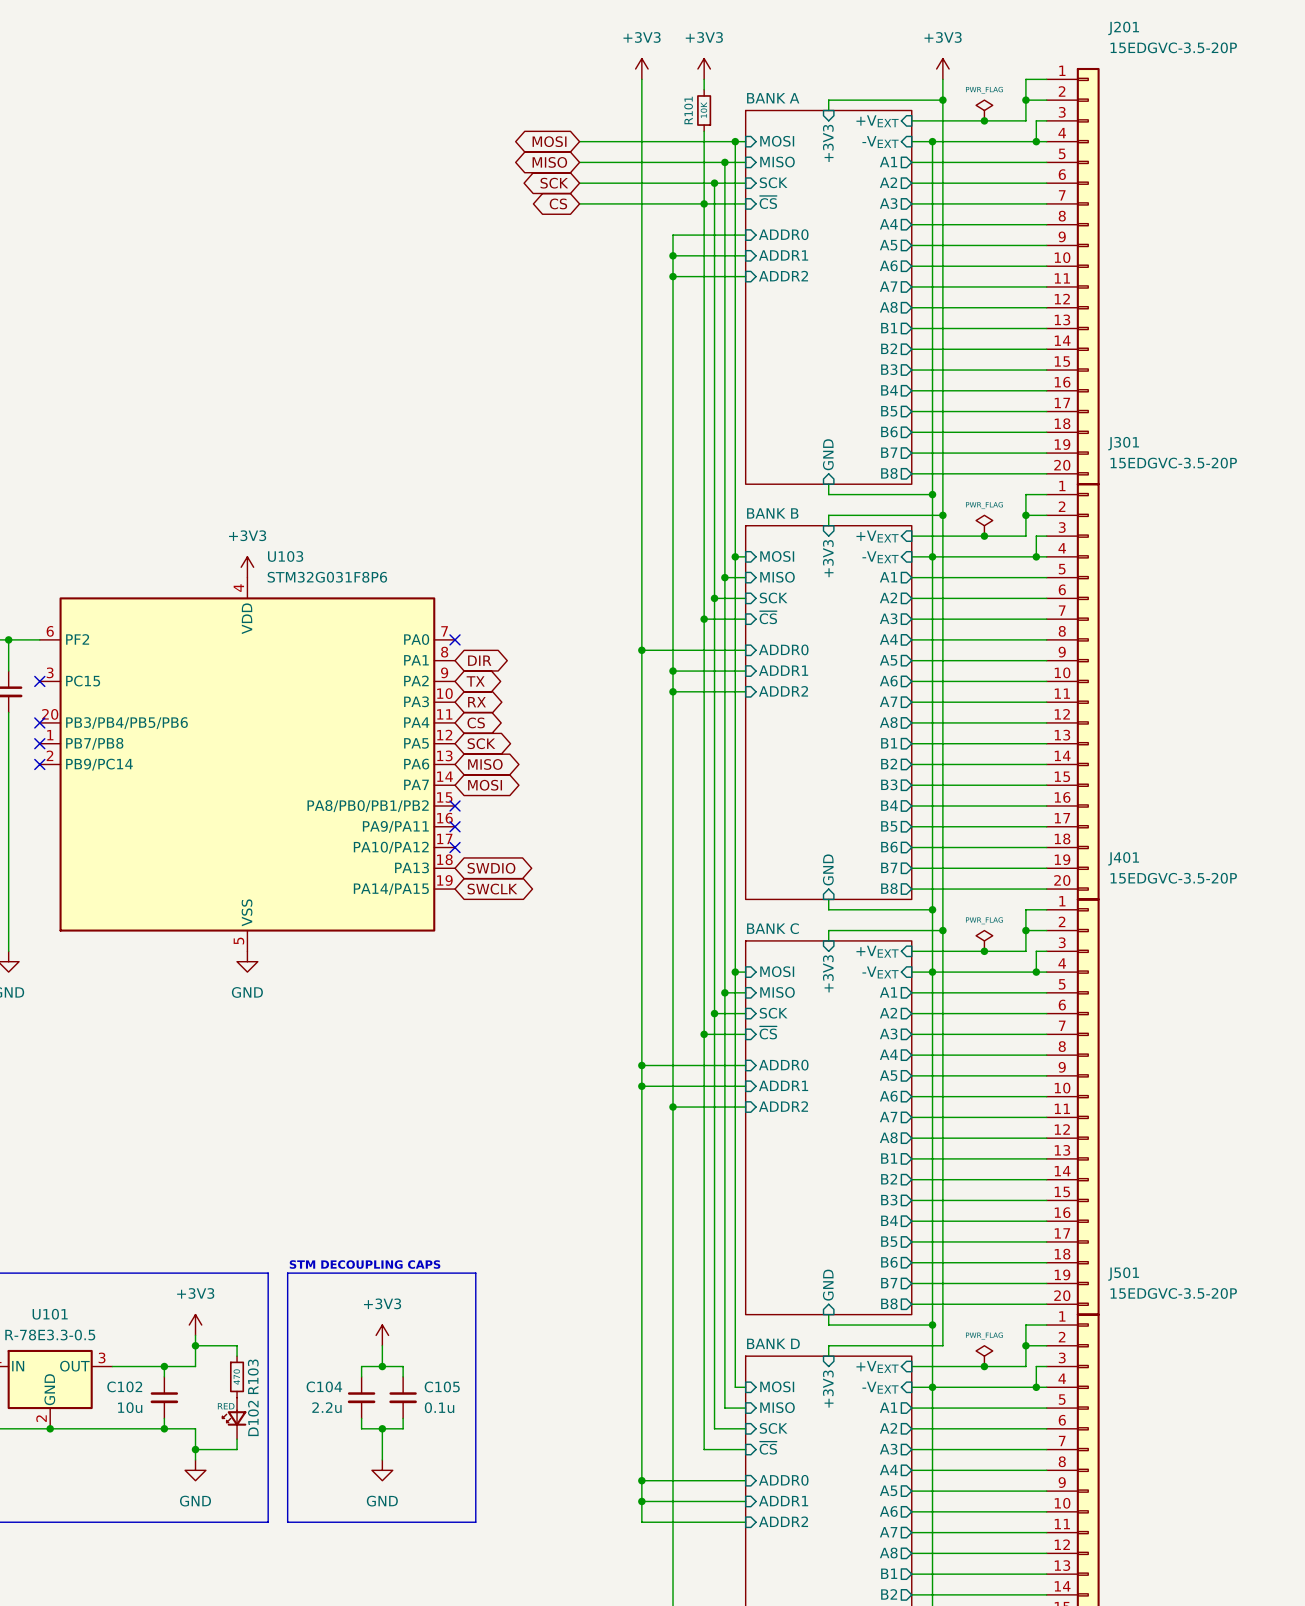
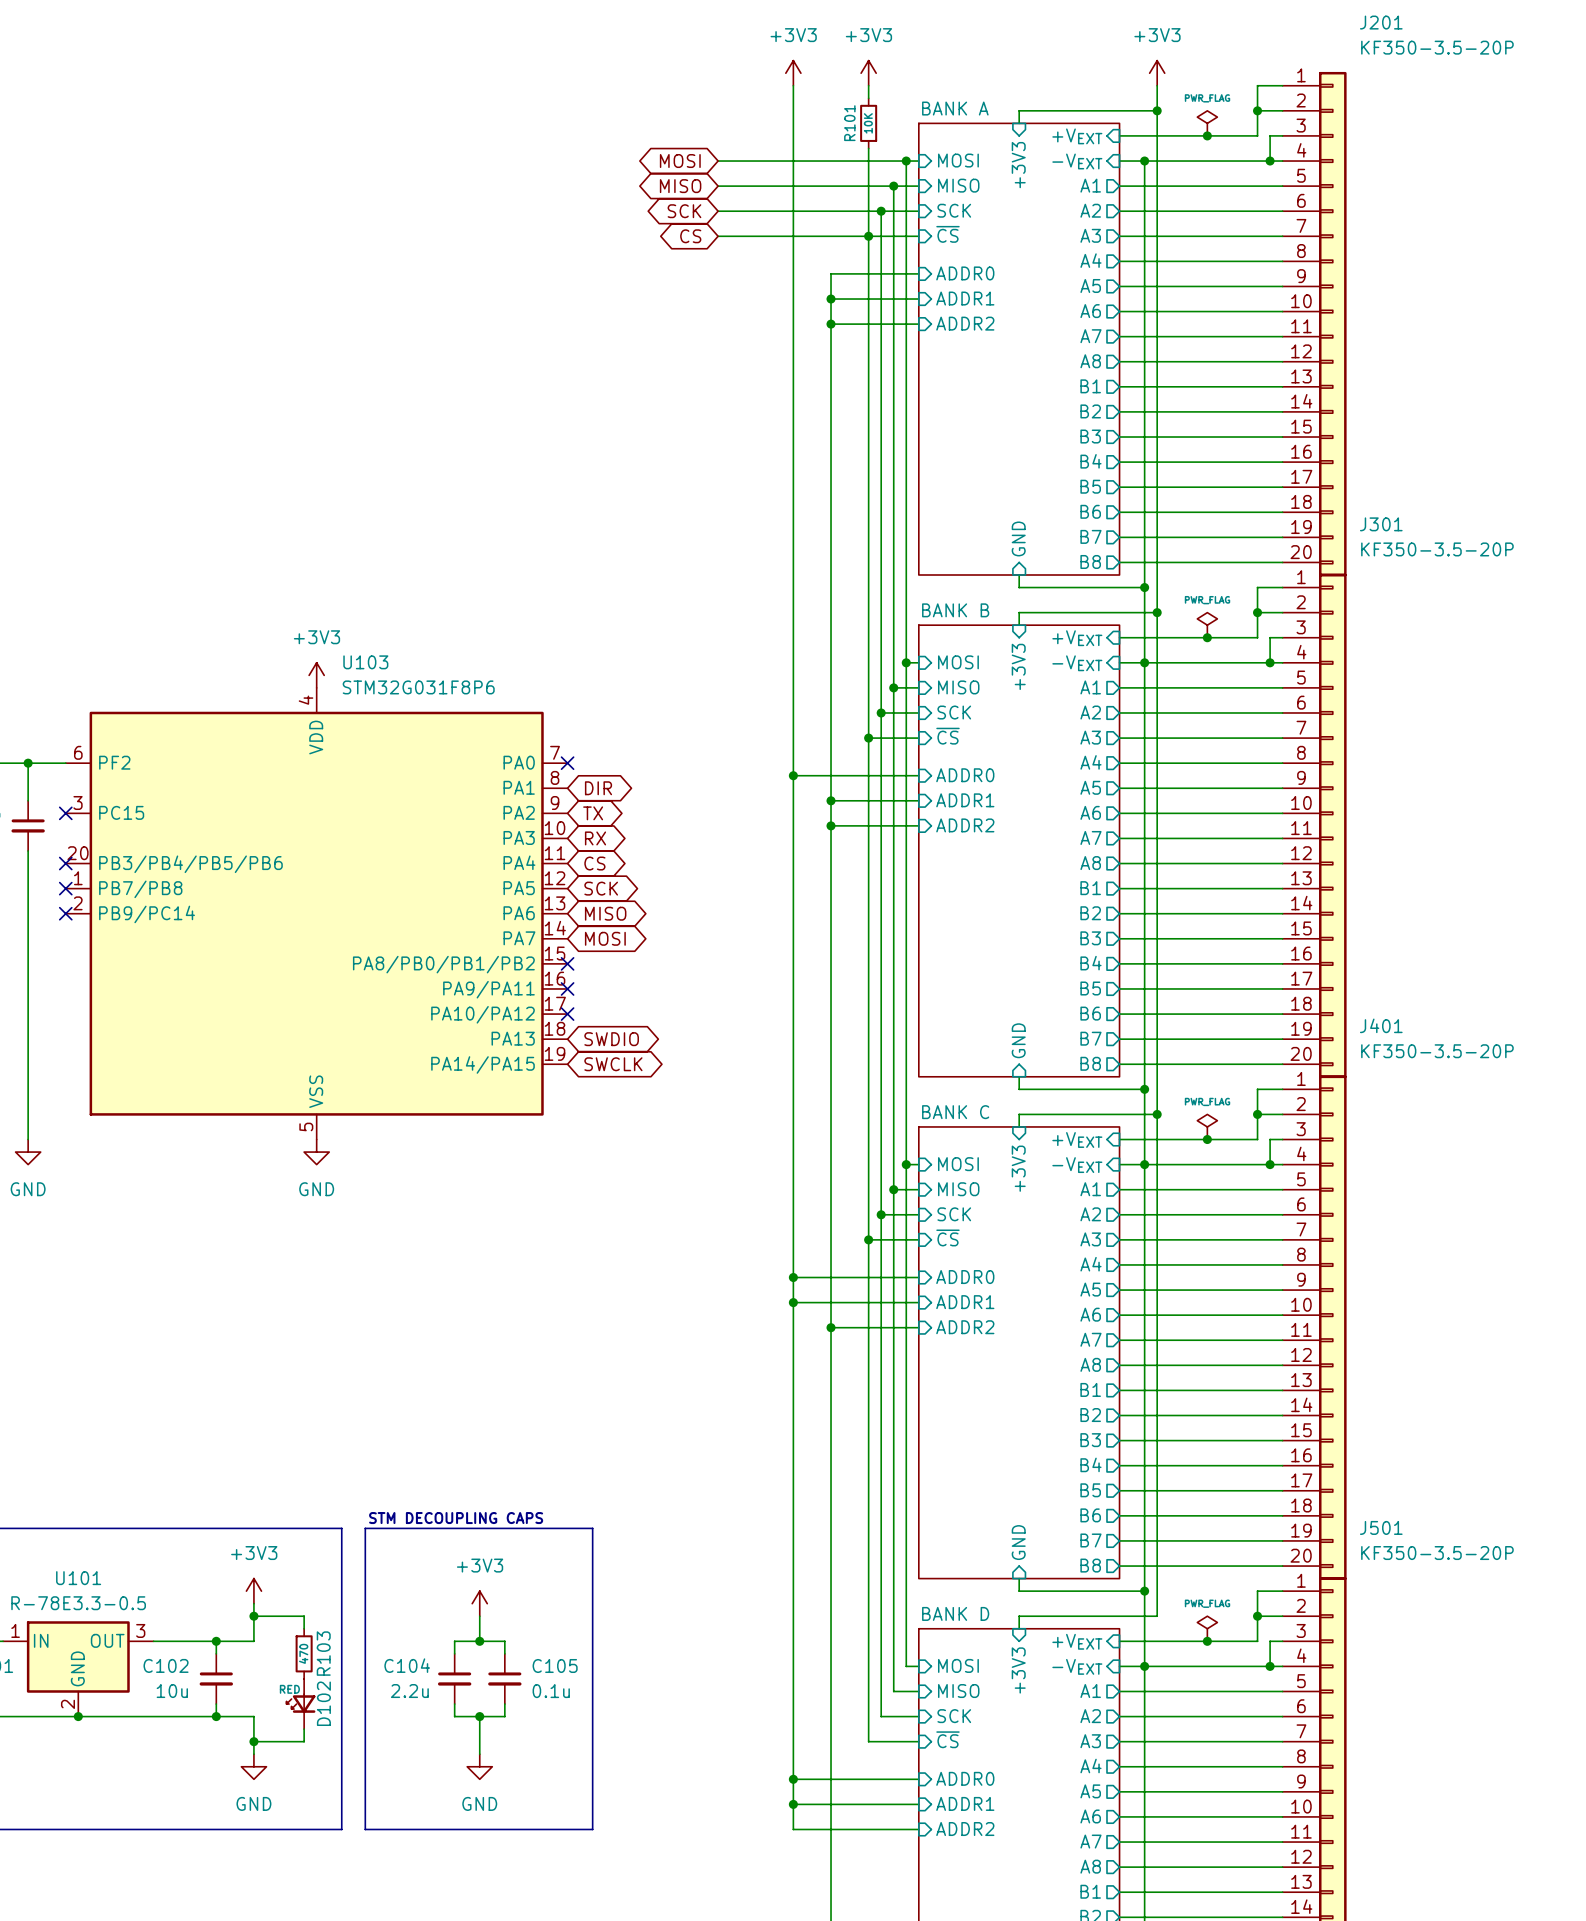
J201 value: 15EDGVC-3.5-20P (1173, 47) -> KF350-3.5-20P (1437, 47)
J301 value: 15EDGVC-3.5-20P (1173, 463) -> KF350-3.5-20P (1437, 549)
J401 value: 15EDGVC-3.5-20P (1173, 878) -> KF350-3.5-20P (1437, 1051)
J501 value: 15EDGVC-3.5-20P (1173, 1293) -> KF350-3.5-20P (1437, 1553)

